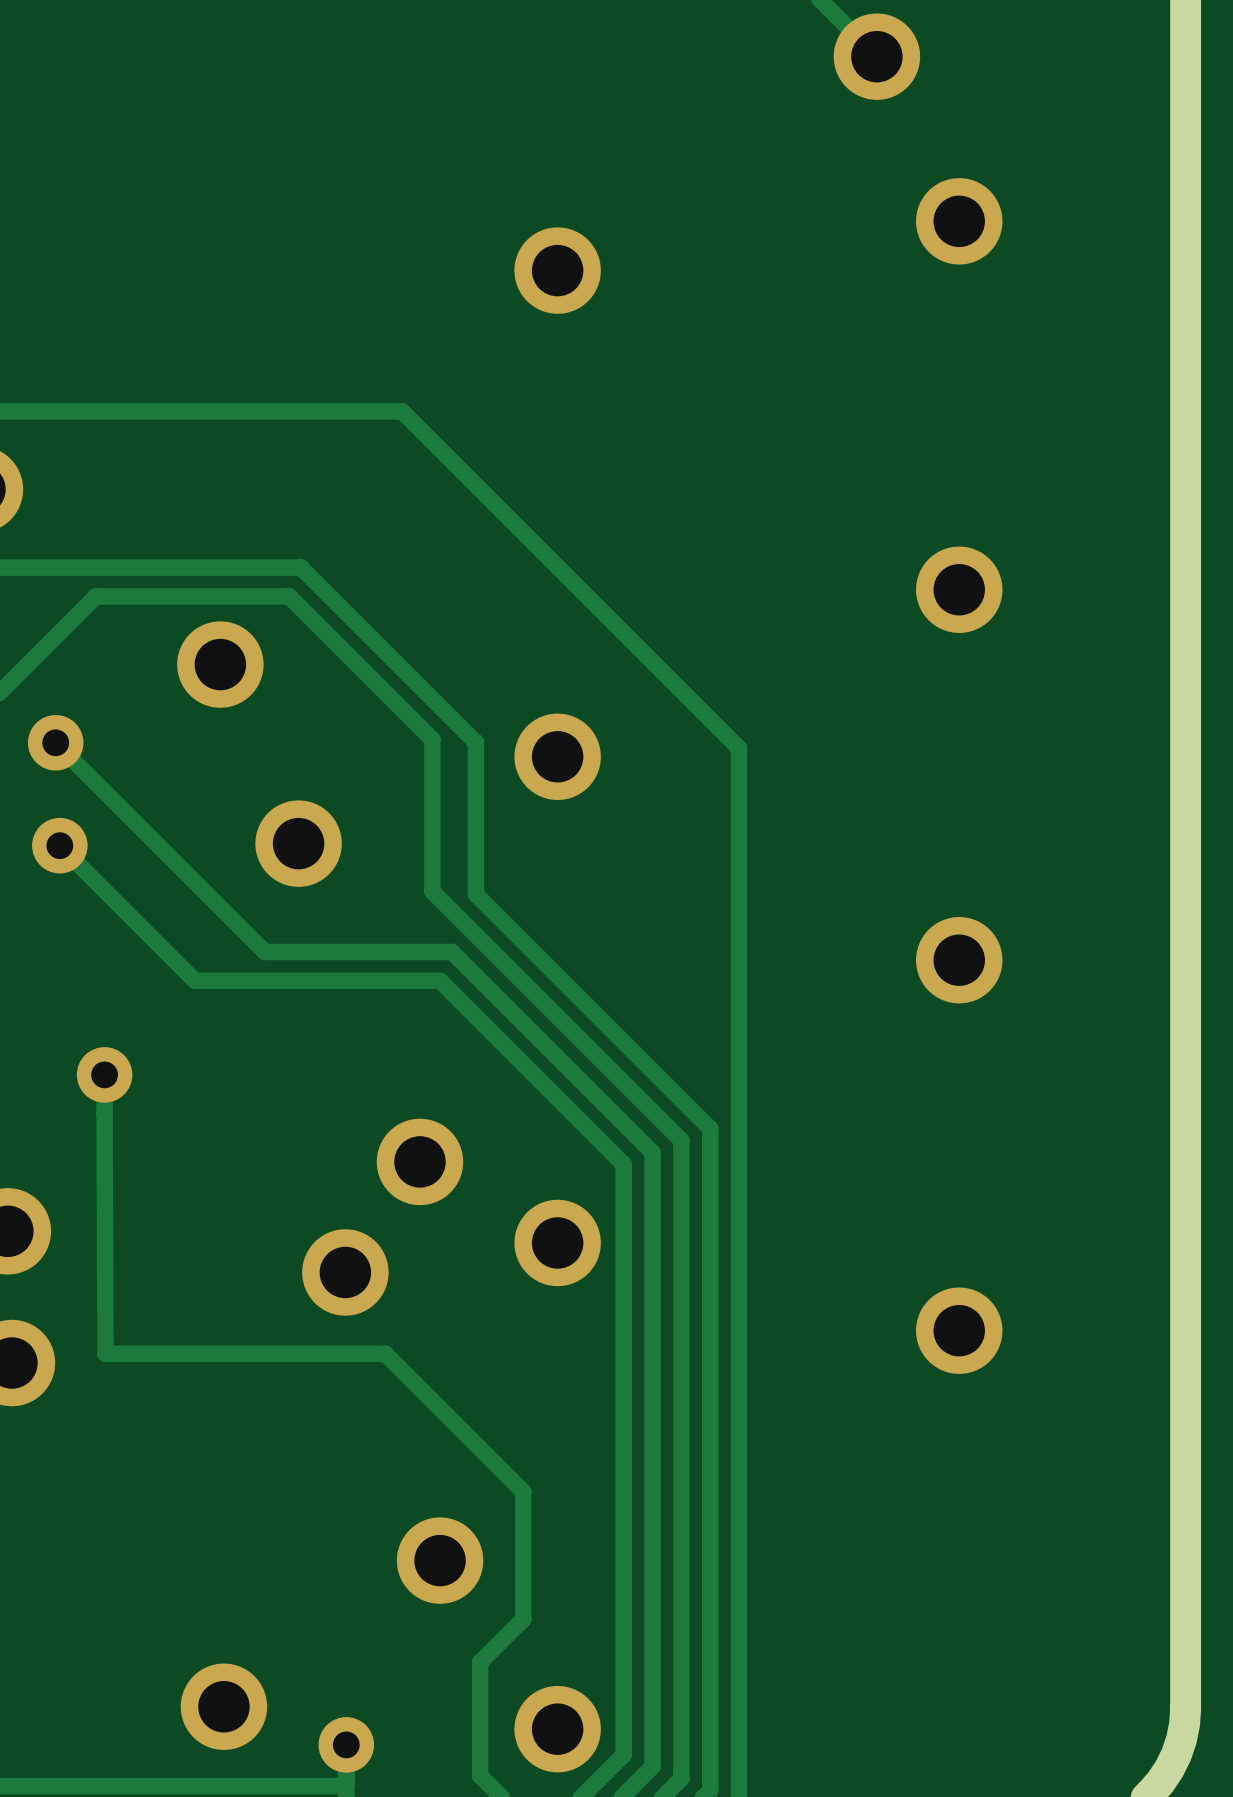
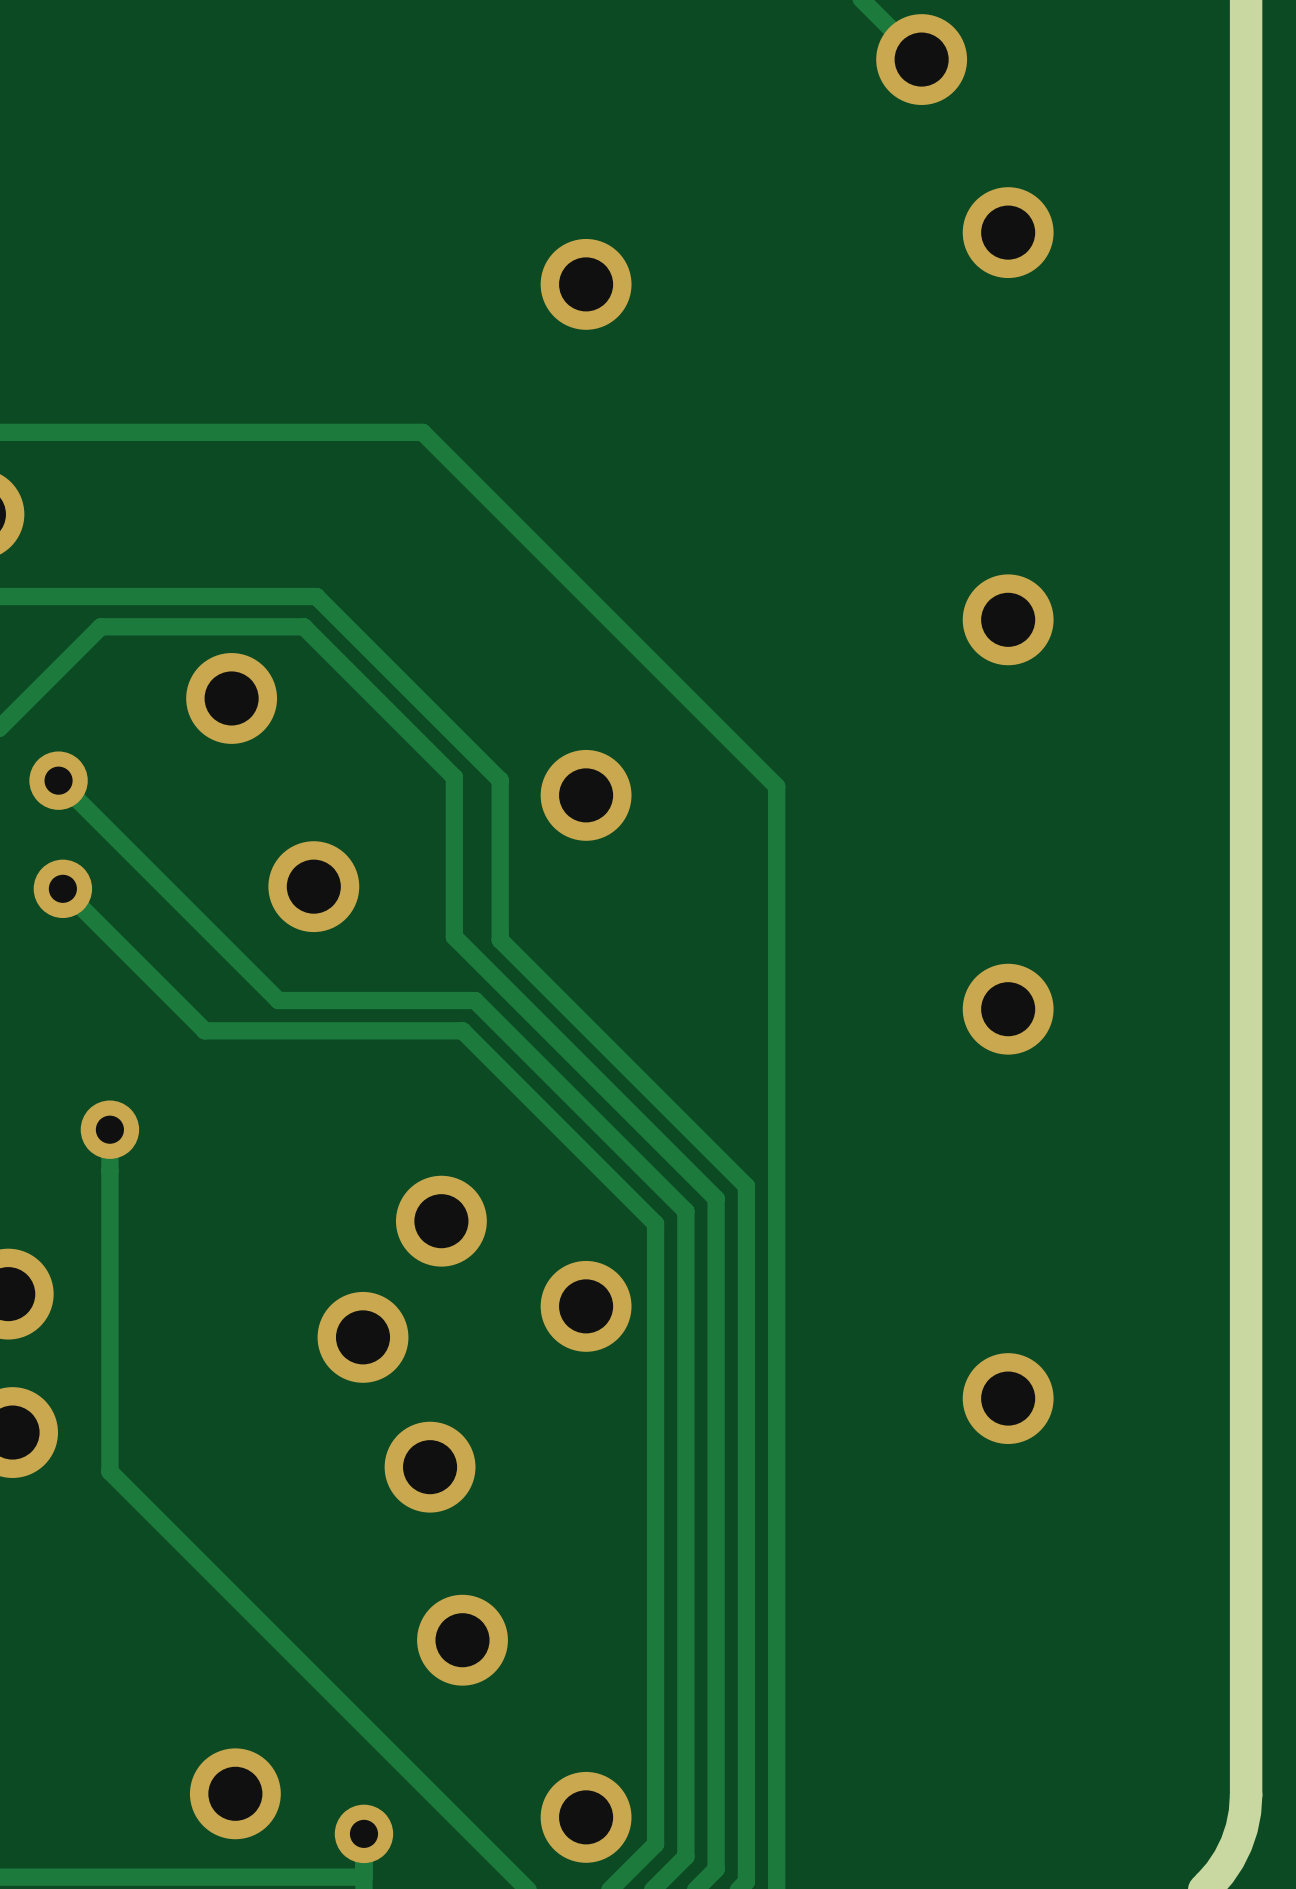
track: (104, 1114) (105, 1353) (385, 1353) (523, 1491) (523, 1619) (480, 1662) (480, 1775) -> (109, 1171) (109, 1471) (504, 1866)
via: none -> (430, 1467)

